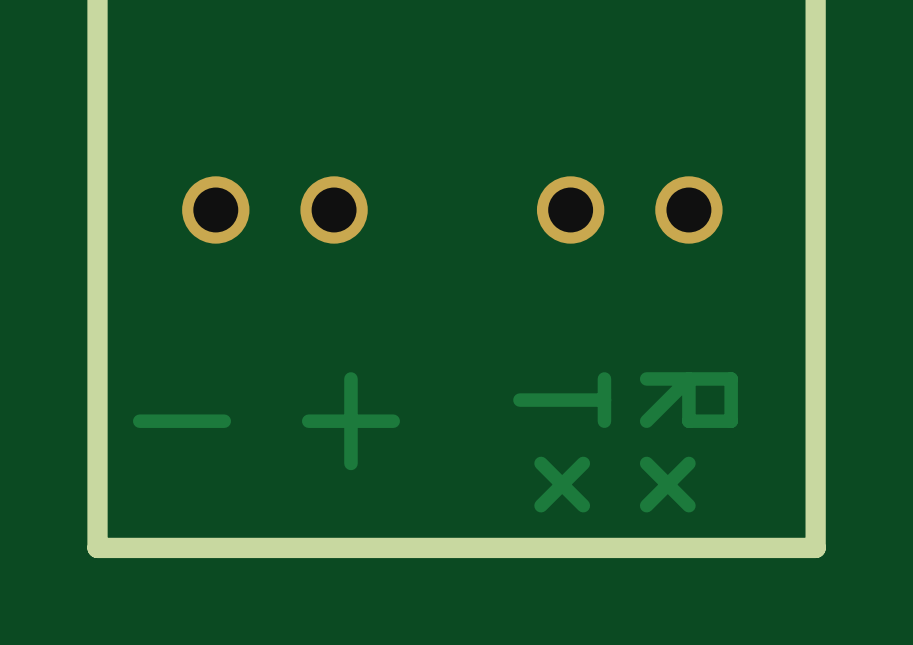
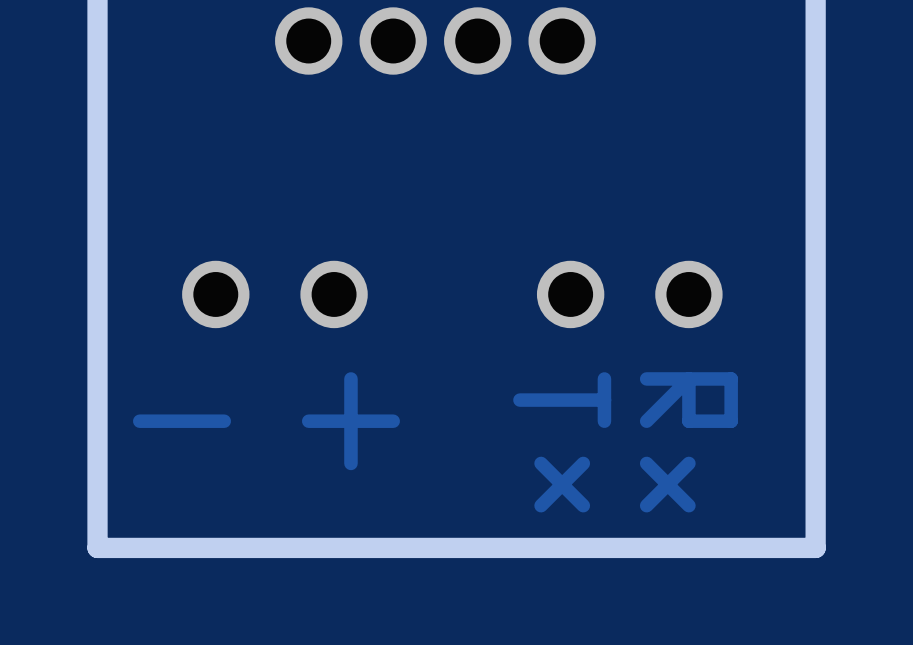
via: none -> (308, 41)
via: none -> (393, 41)
via: none -> (477, 41)
via: none -> (562, 41)
via: (215, 209) -> none
via: (334, 209) -> none
via: (570, 209) -> none
via: (688, 209) -> none
via: none -> (215, 294)
via: none -> (334, 294)
via: none -> (570, 294)
via: none -> (688, 294)

